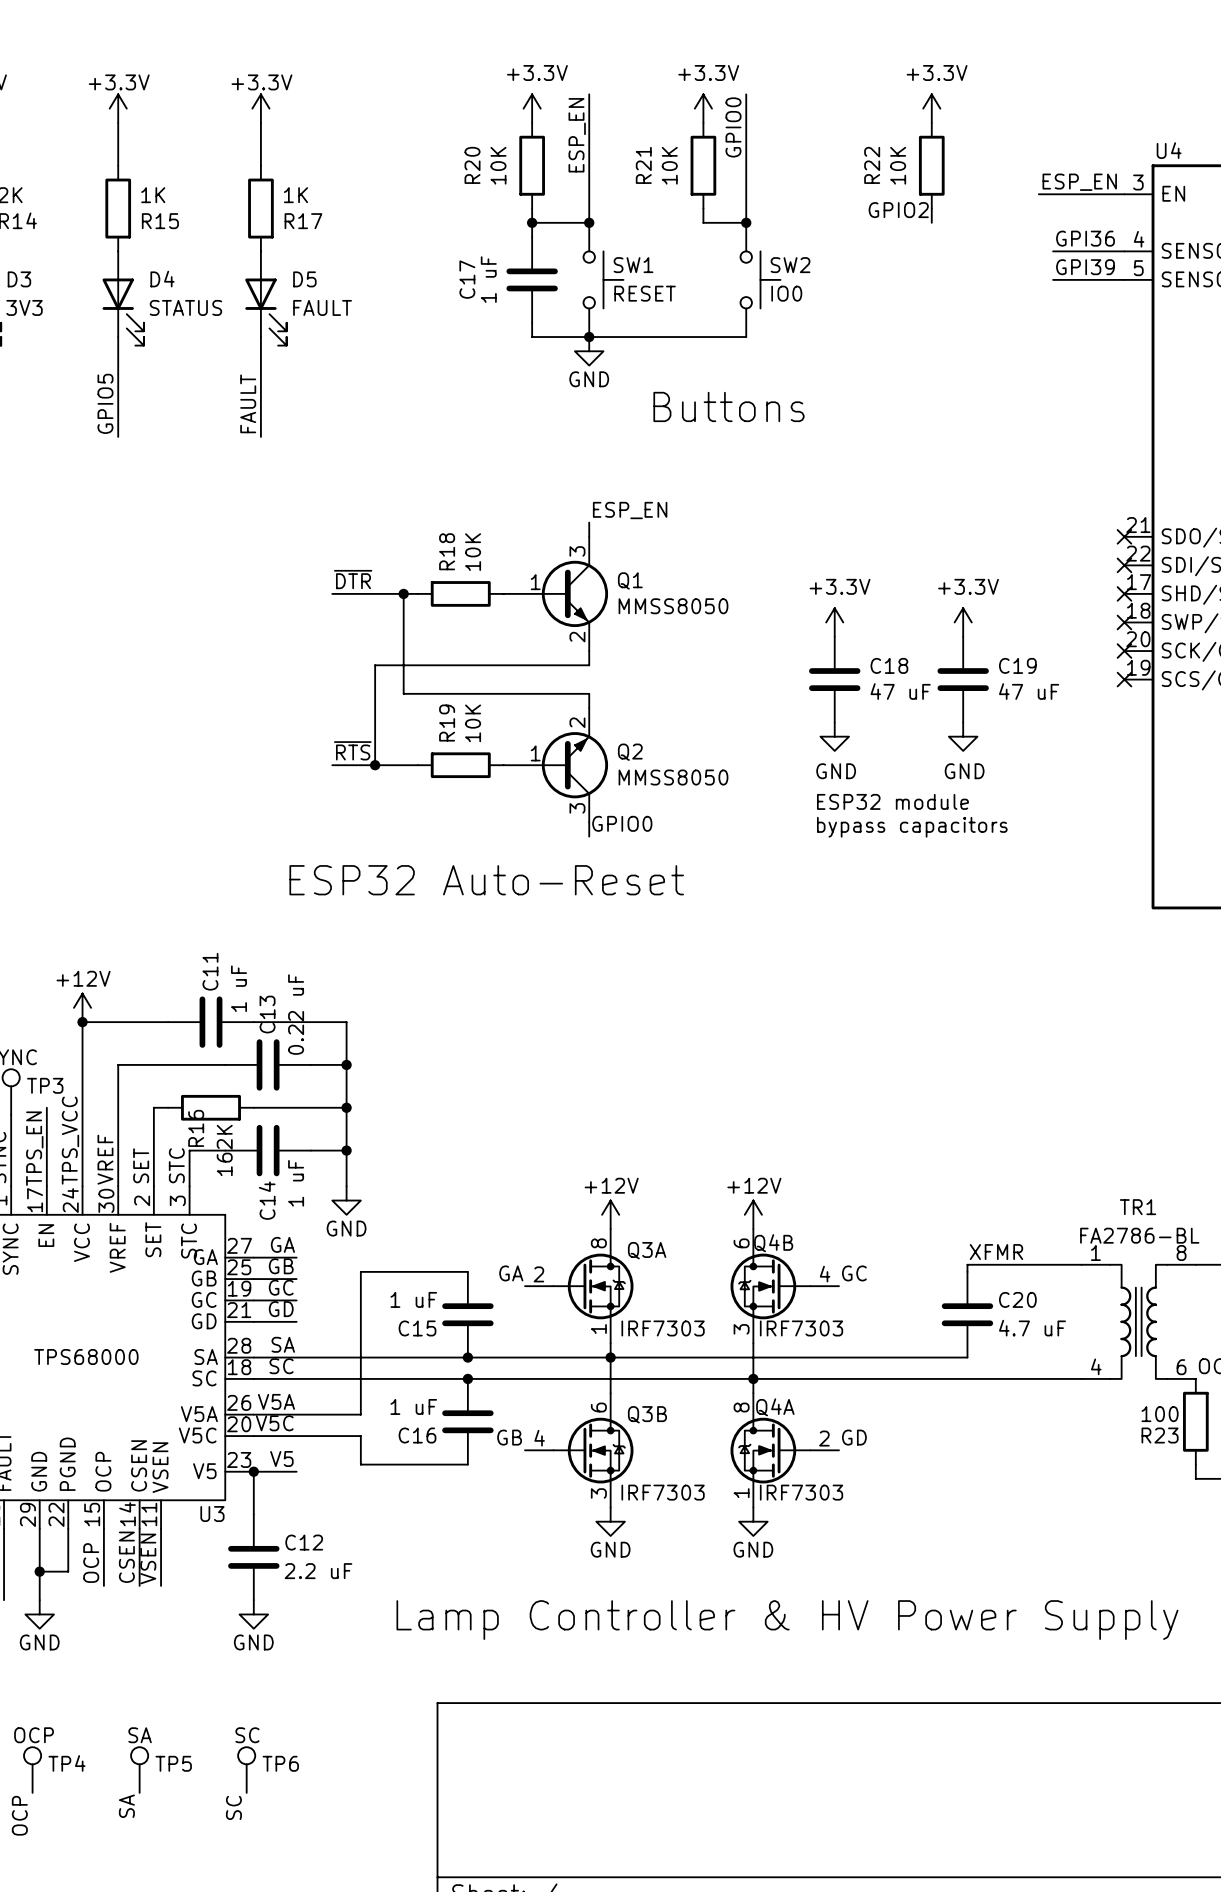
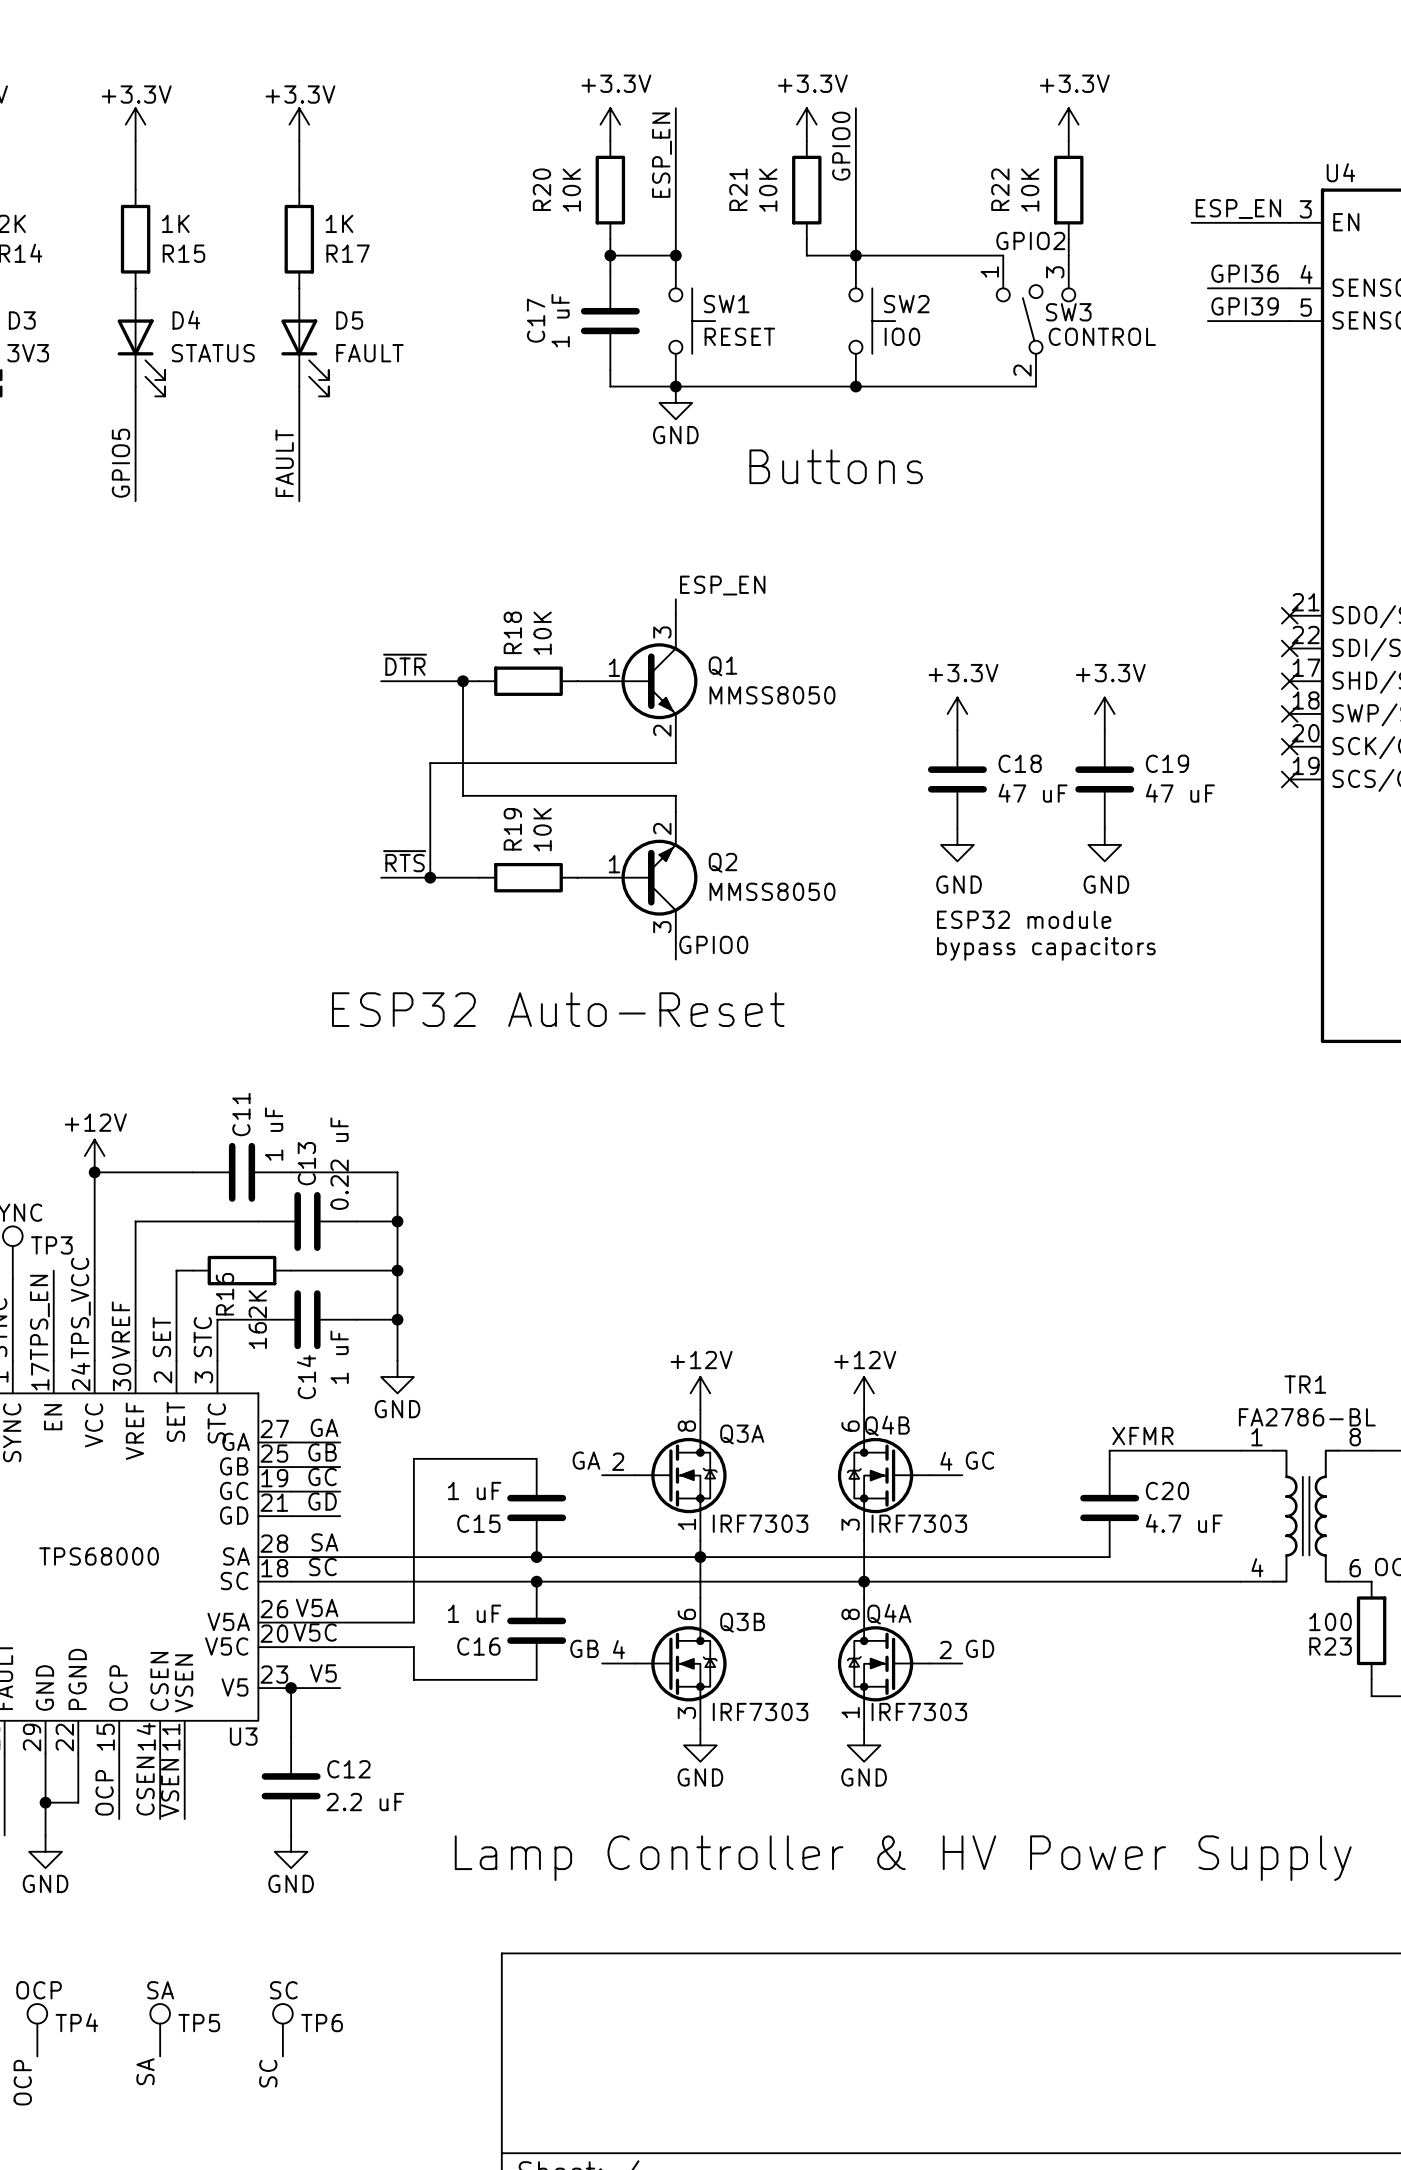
wire: none -> (855, 255) (1003, 255)
SW3: none -> CONTROL (1036, 321)
wire: none -> (855, 386) (1036, 386)
junction: none -> (855, 386)

